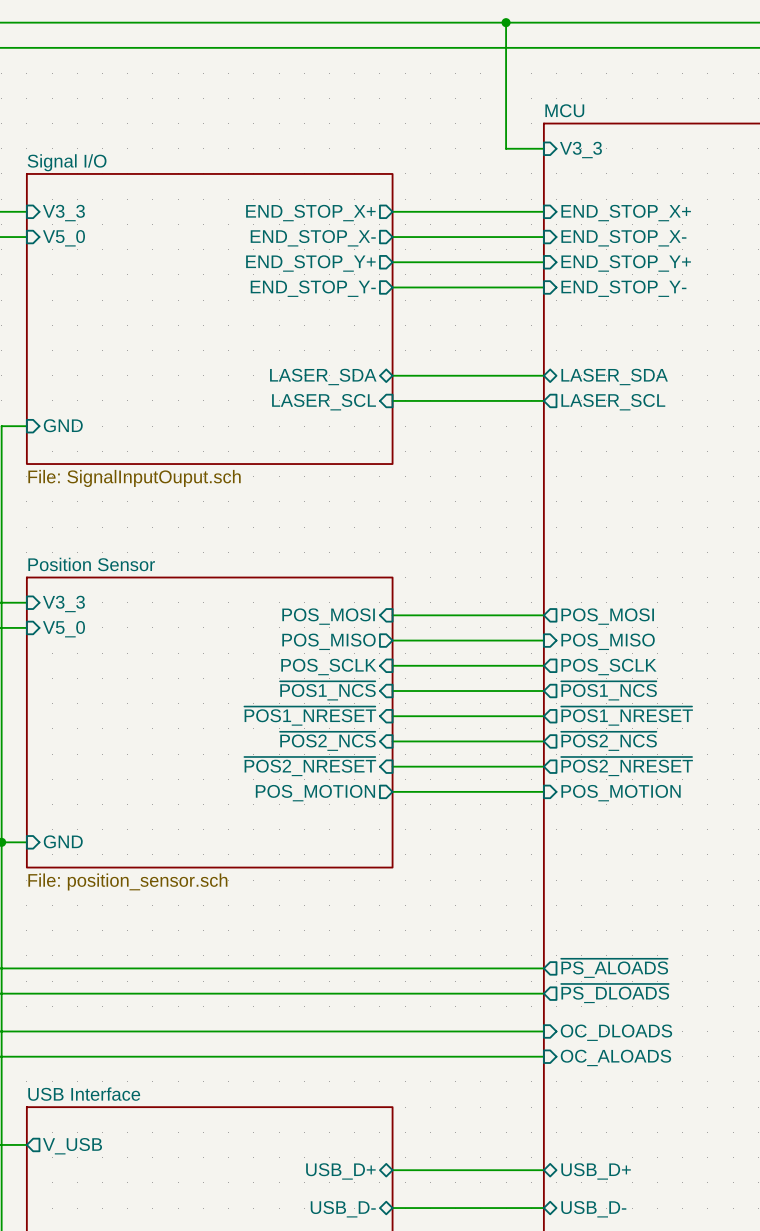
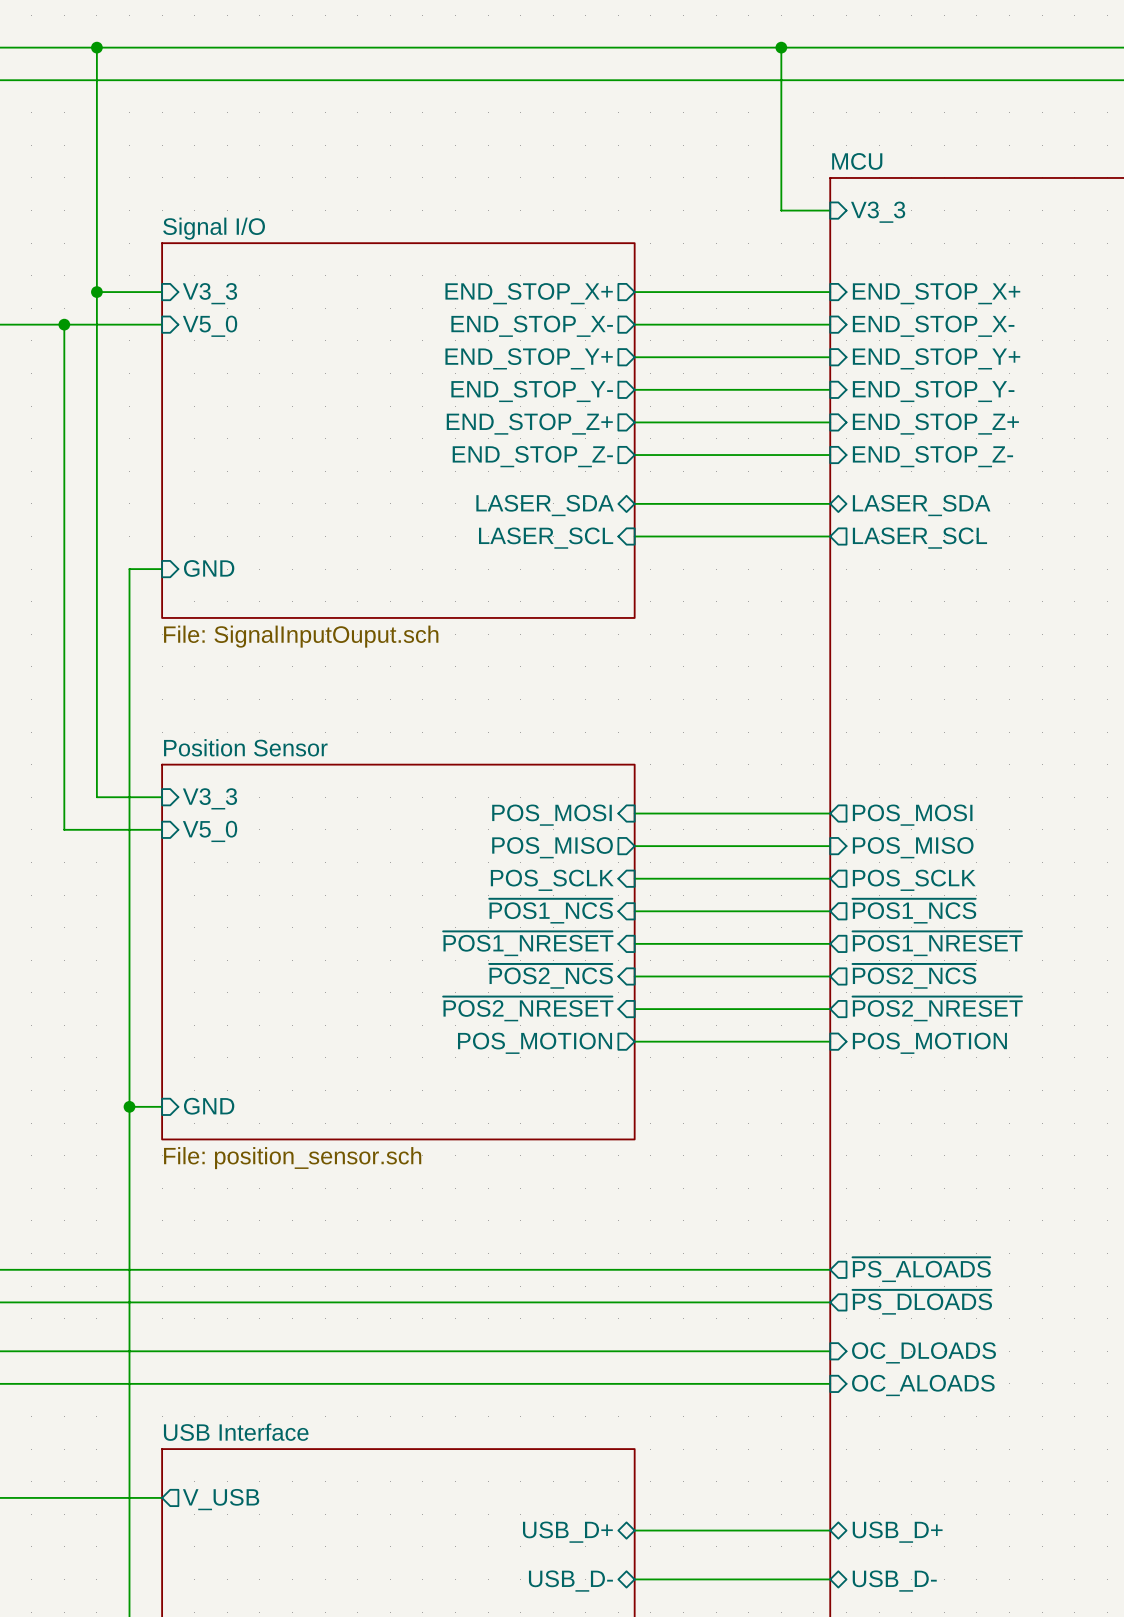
wire: none -> (634, 422) (830, 422)
sheet pin: none -> END_STOP_Z+ (529, 424)
sheet pin: none -> END_STOP_Z+ (935, 424)
wire: none -> (634, 455) (830, 455)
sheet pin: none -> END_STOP_Z- (532, 456)
sheet pin: none -> END_STOP_Z- (932, 456)

